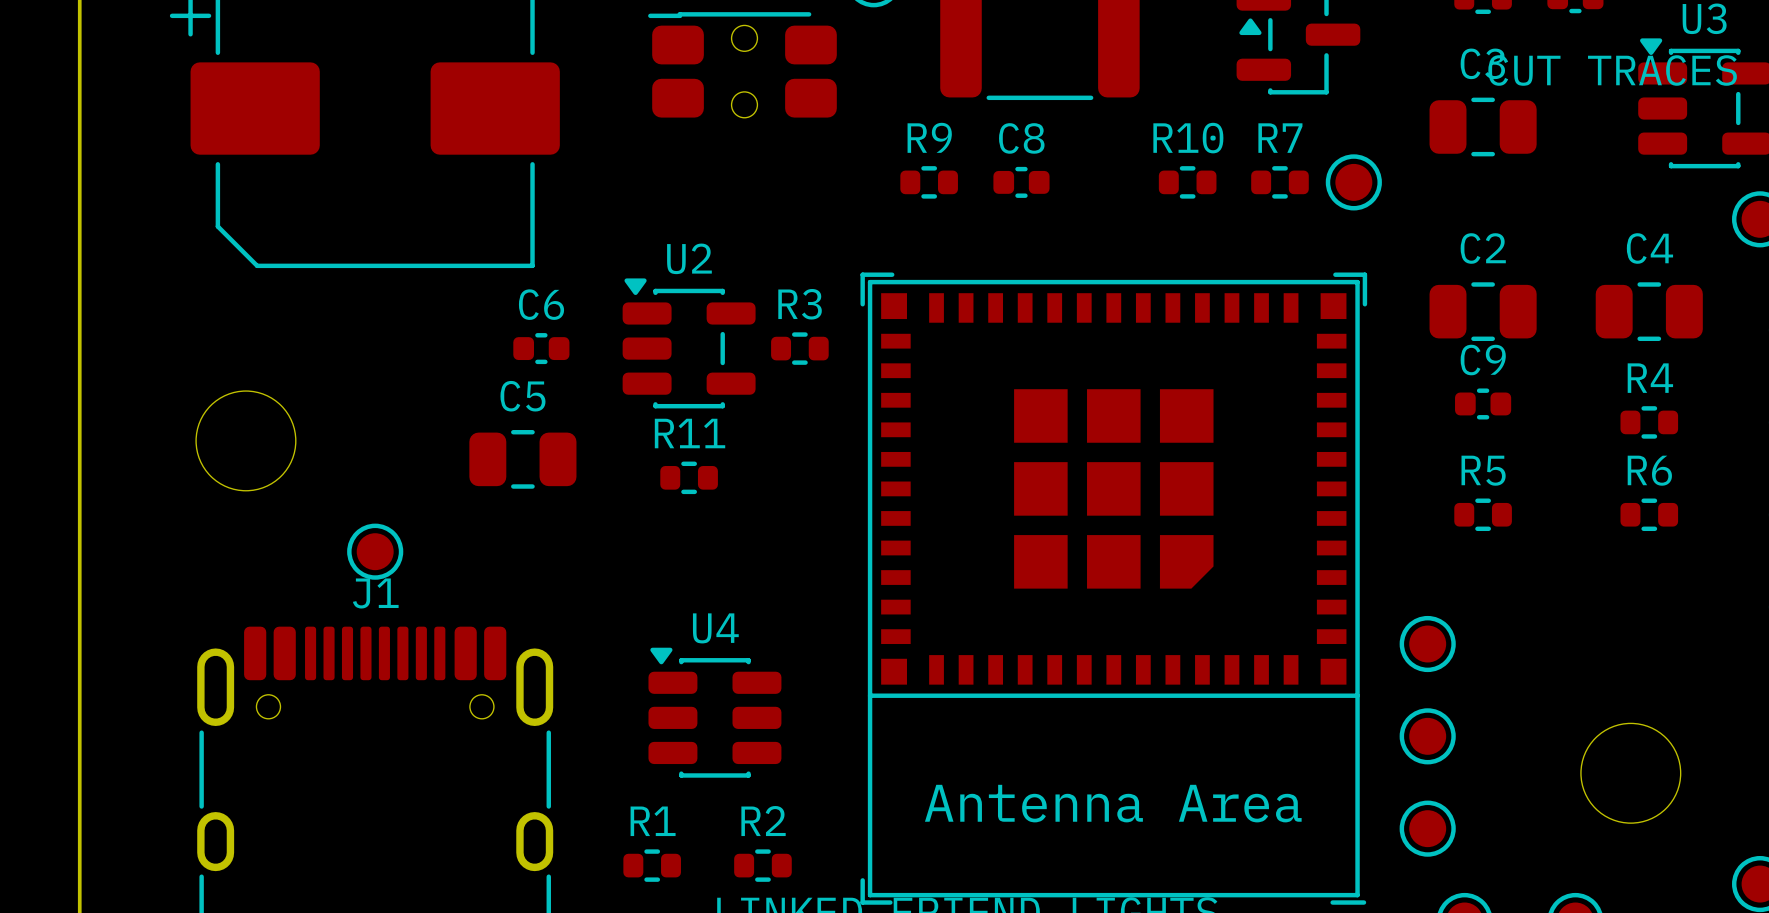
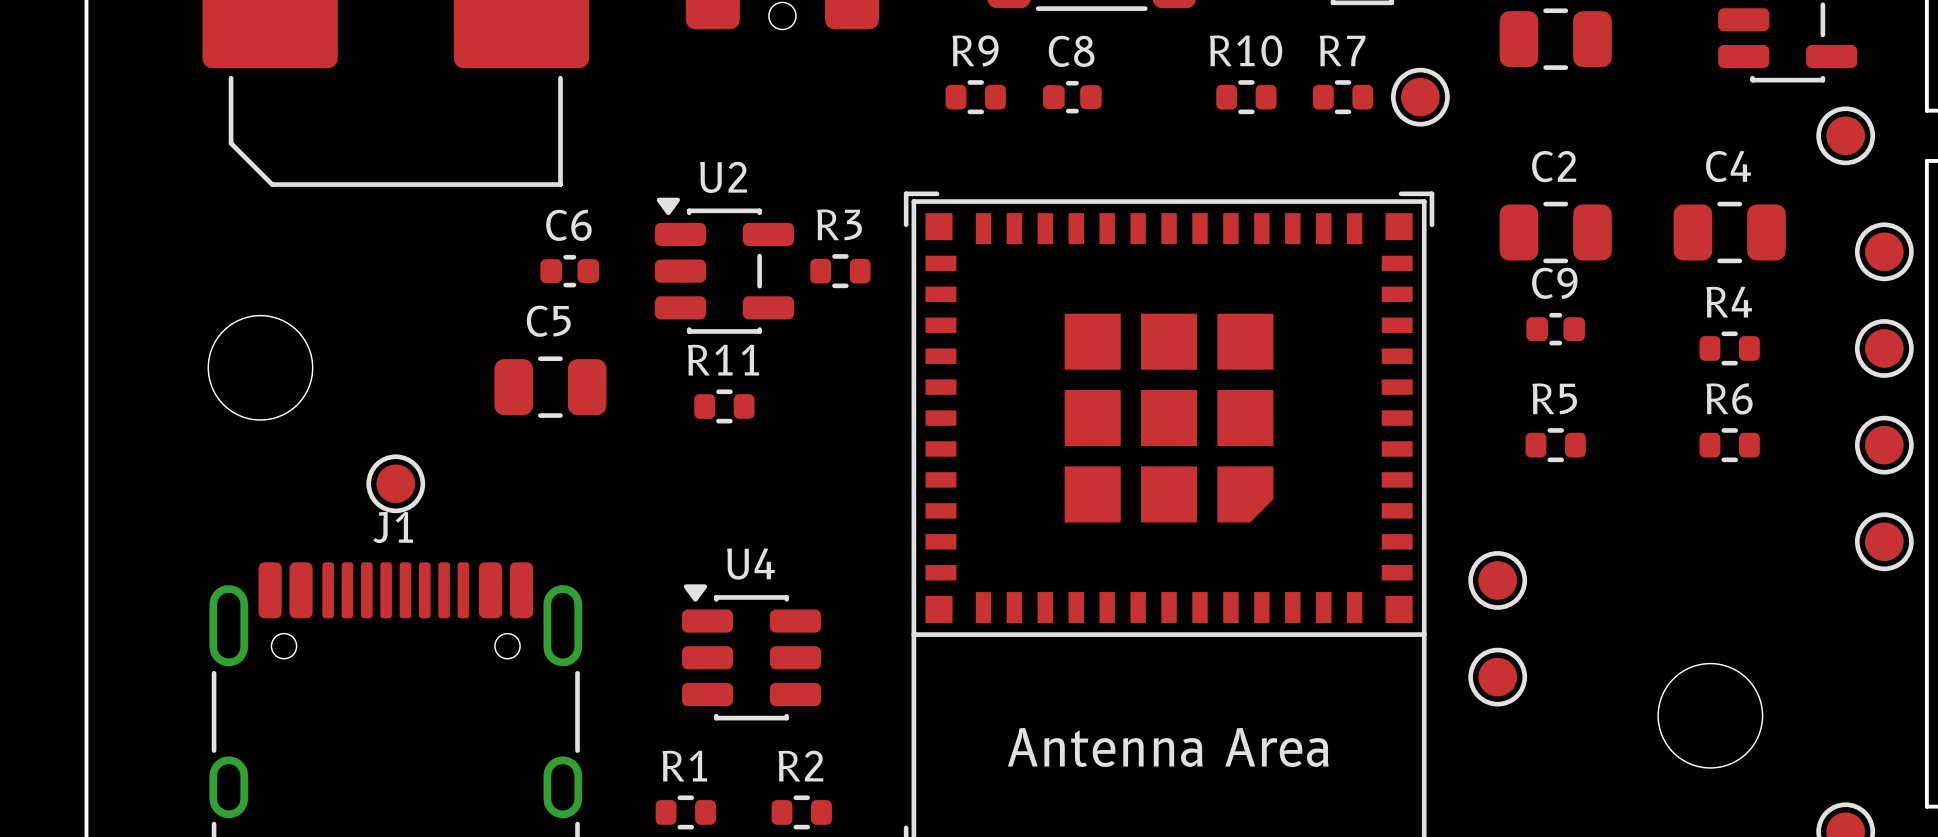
part: (1427, 828) -> none

